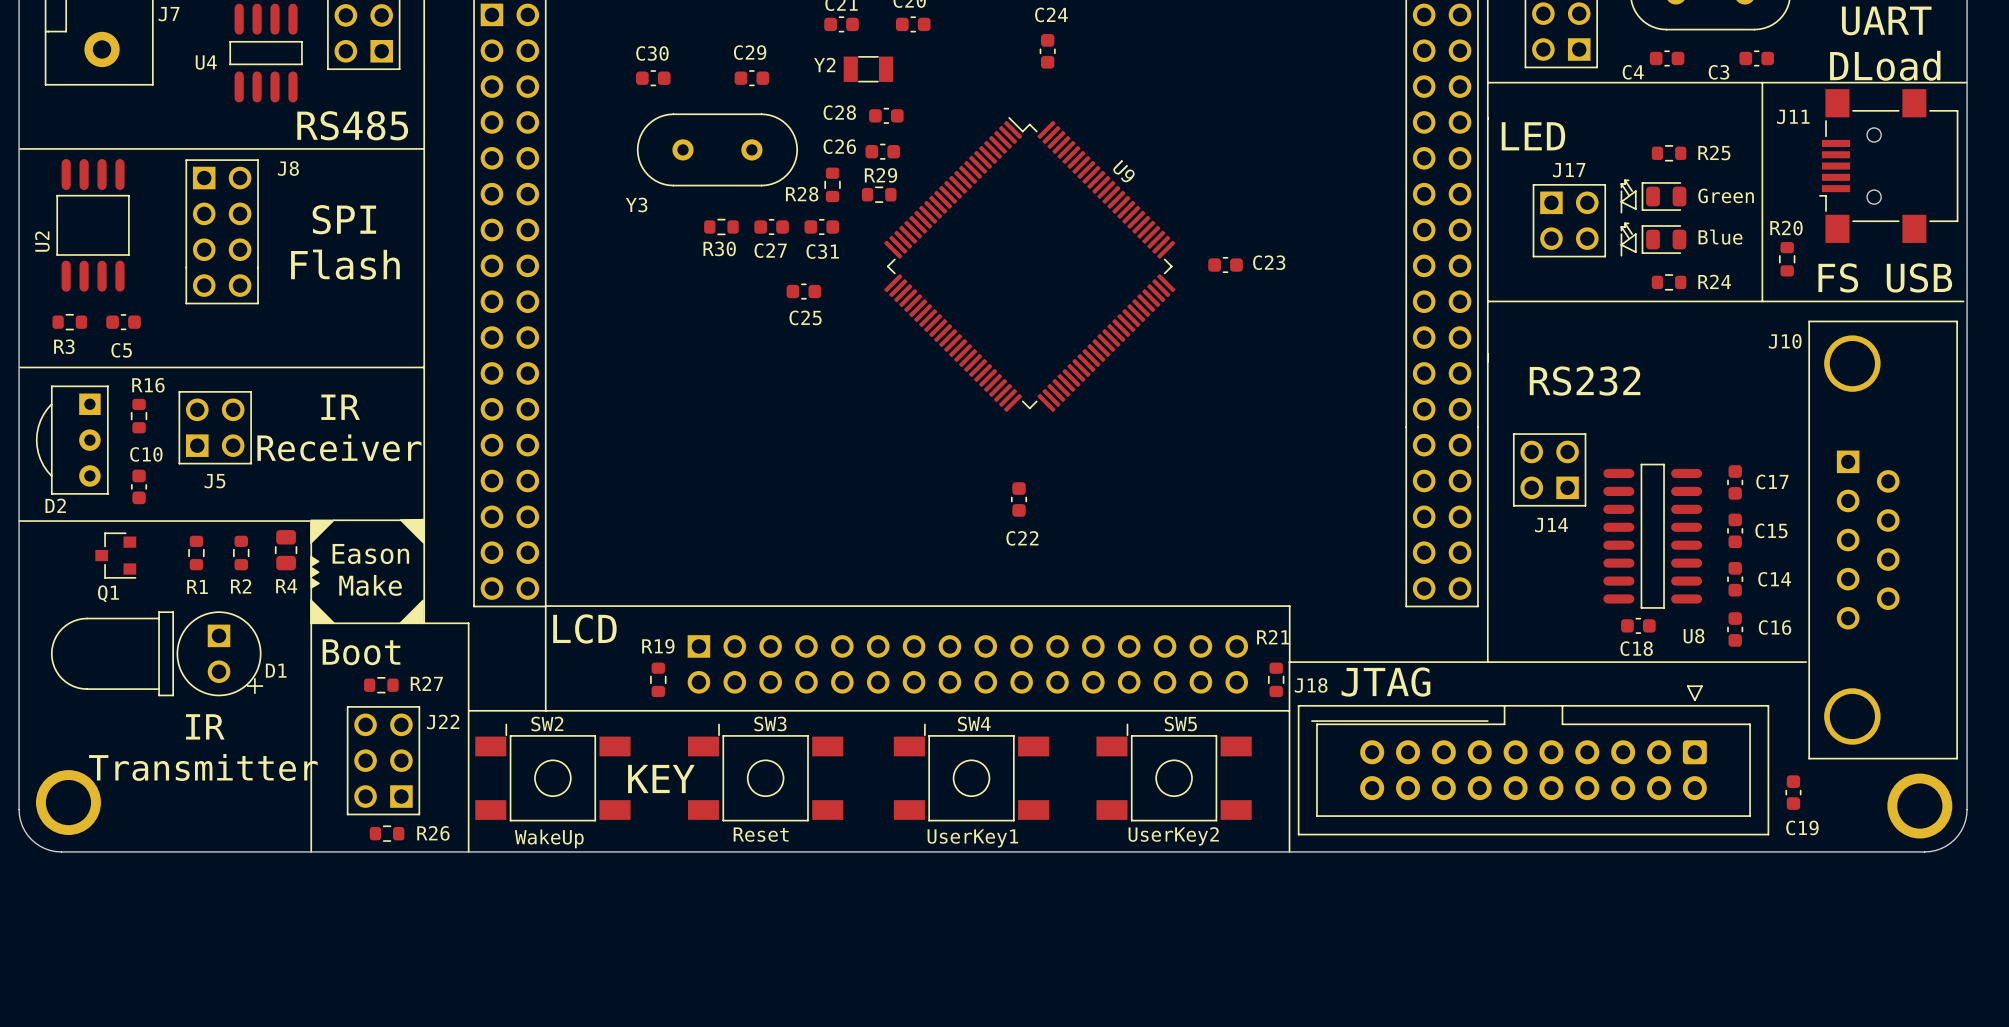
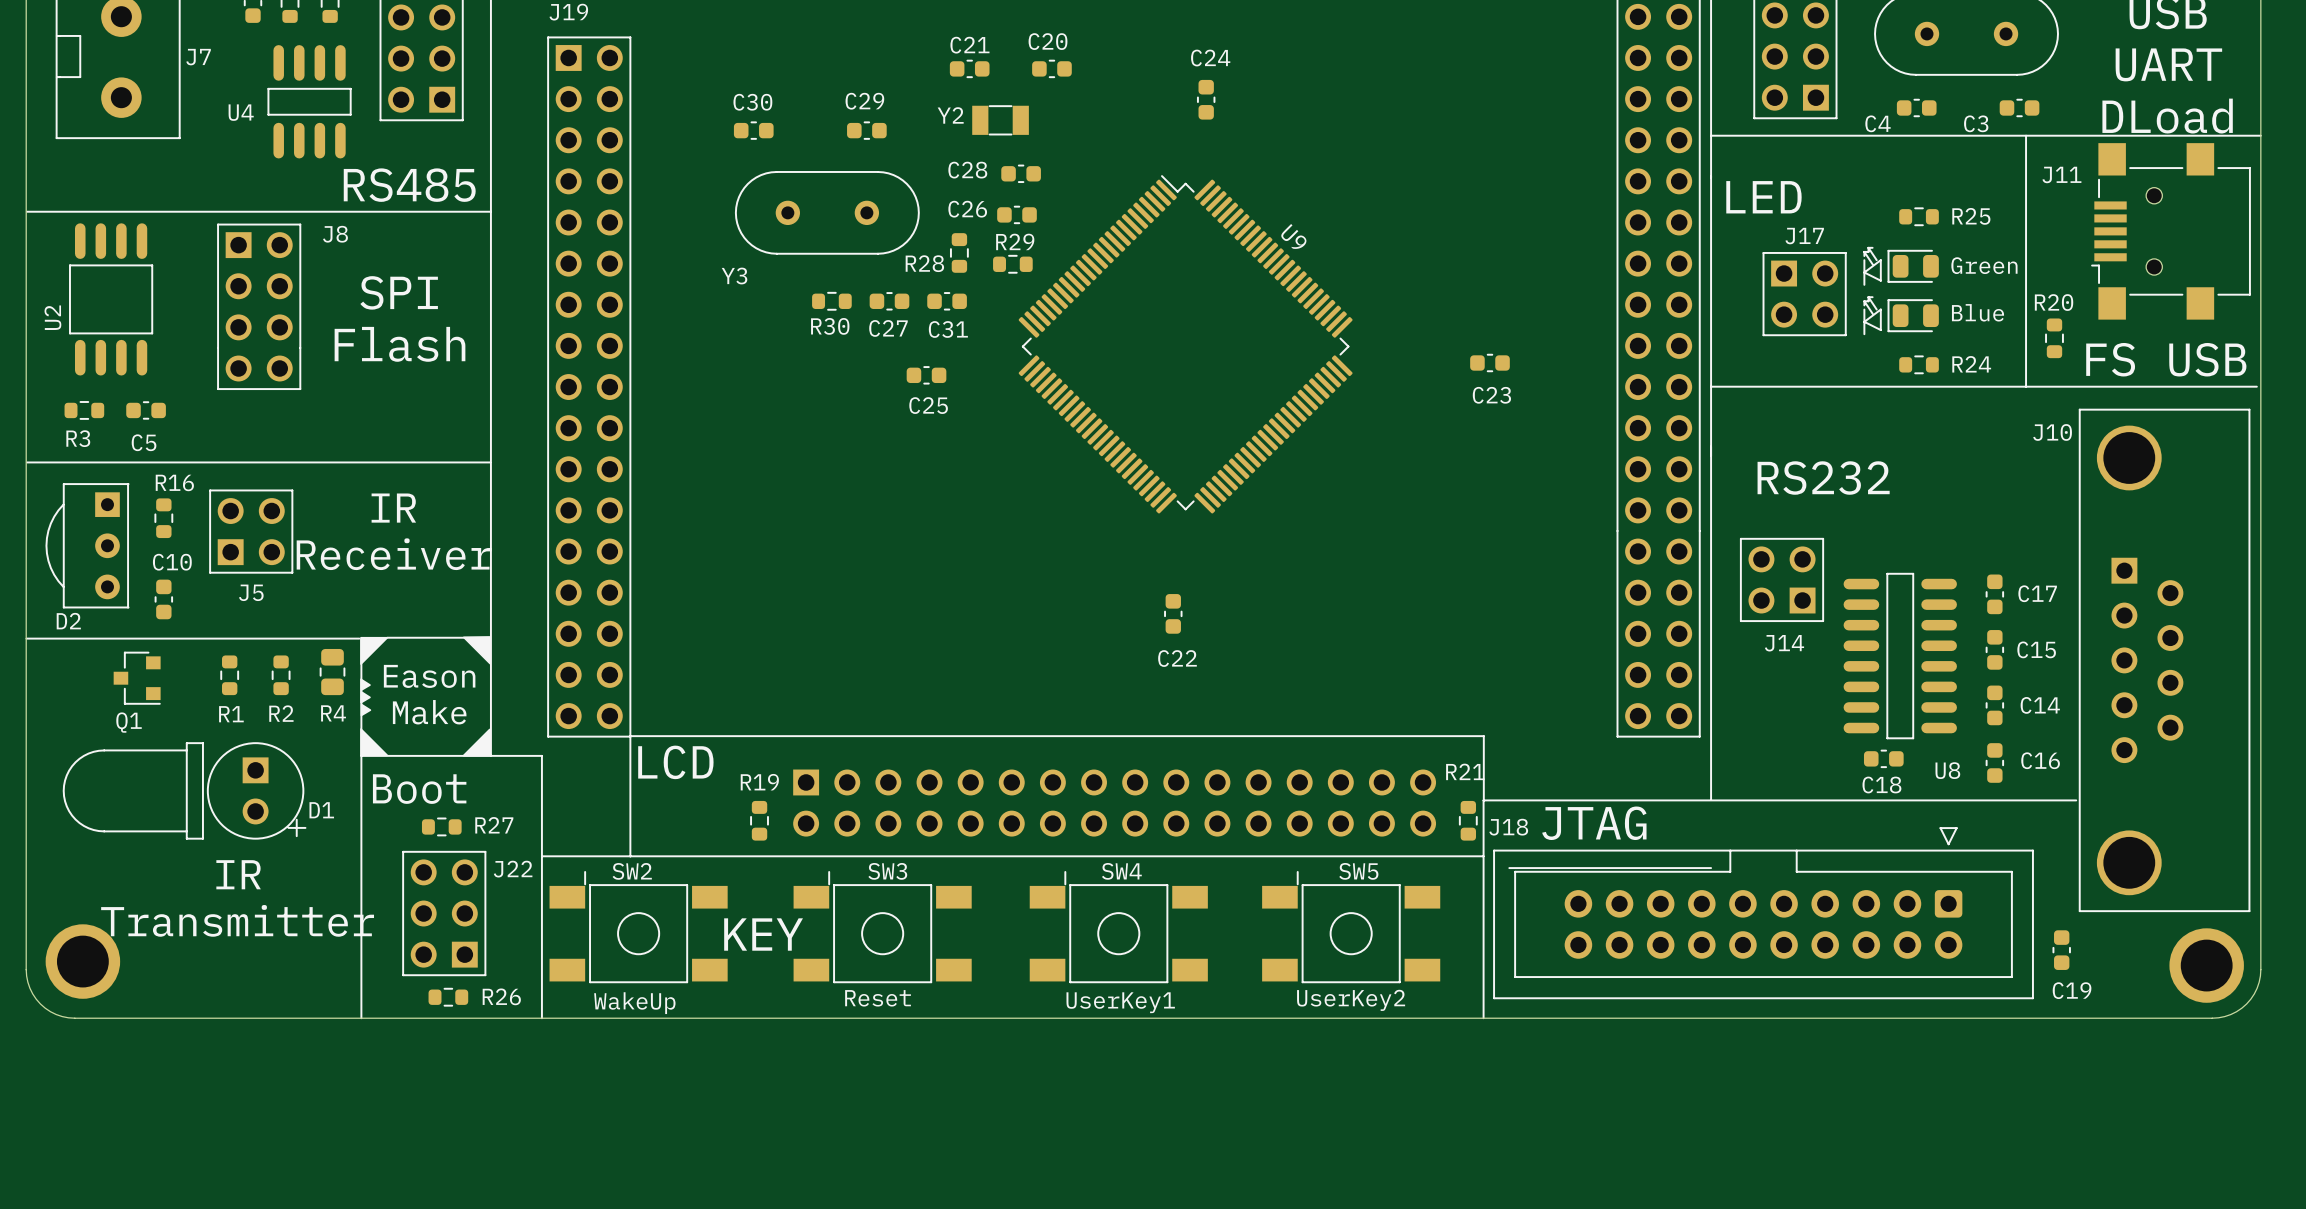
C23 name position: C23 (1269, 262) -> C23 (1491, 395)
C23 position: (1225, 265) -> (1489, 362)

